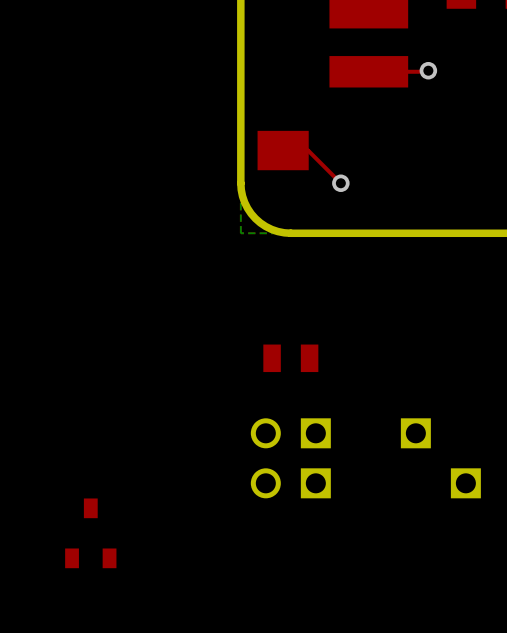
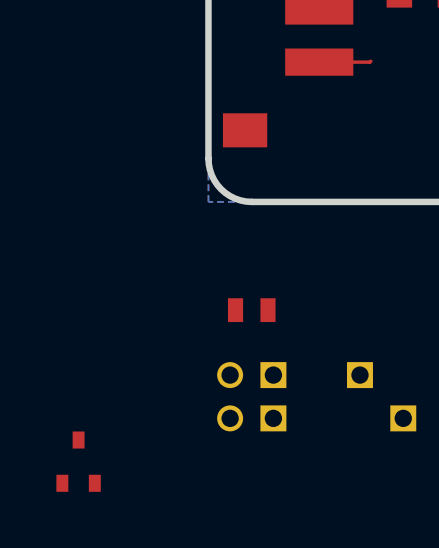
via: (428, 70) -> none
top track: (283, 150) (308, 150) (340, 183) -> none
via: (340, 183) -> none

